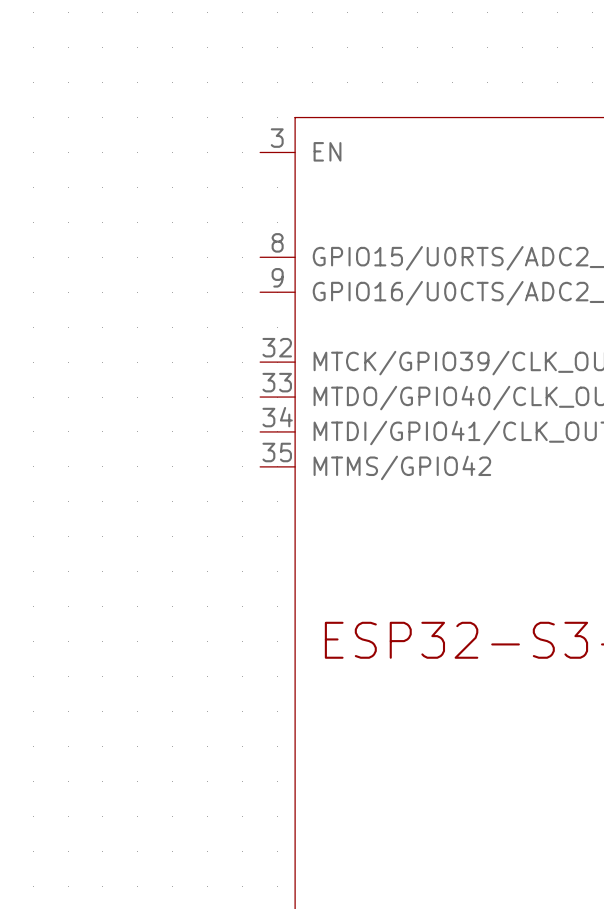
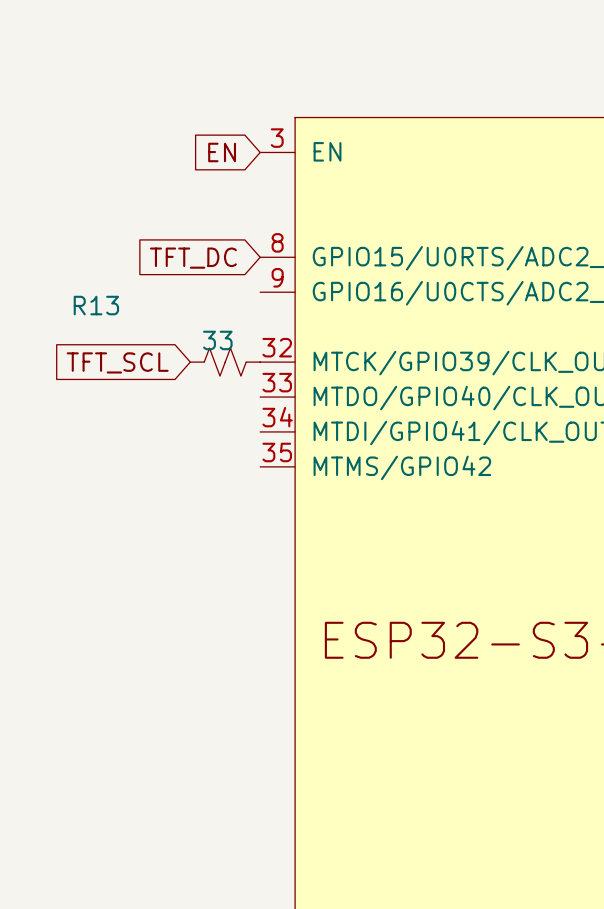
global label: none -> EN (222, 152)
global label: none -> TFT_DC (193, 258)
global label: none -> TFT_SCL (117, 362)
R13: none -> 33 (225, 362)

